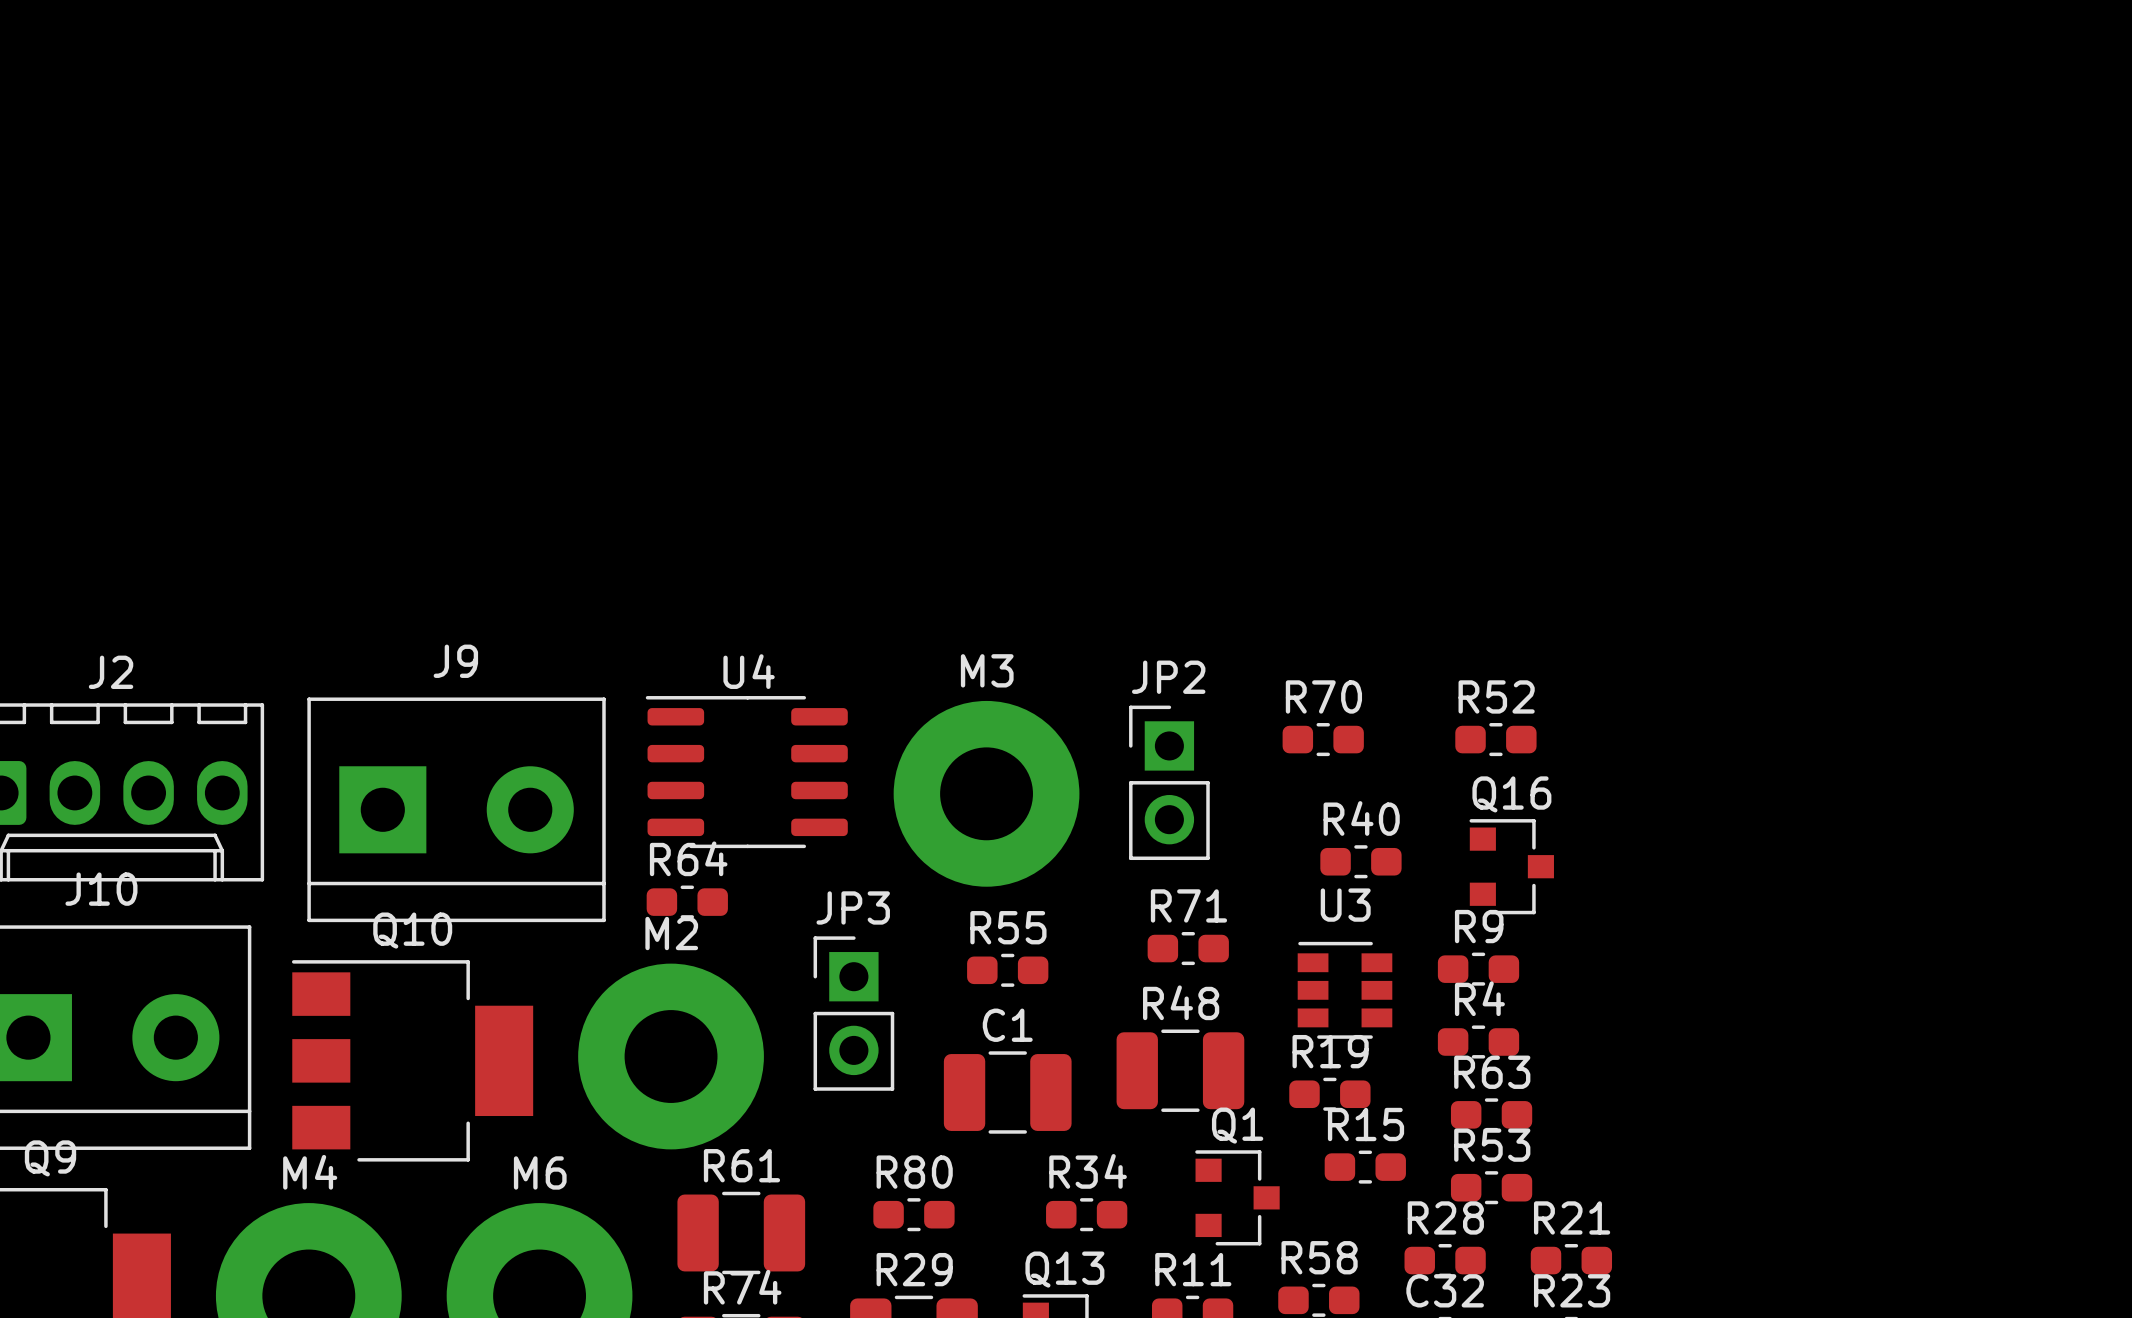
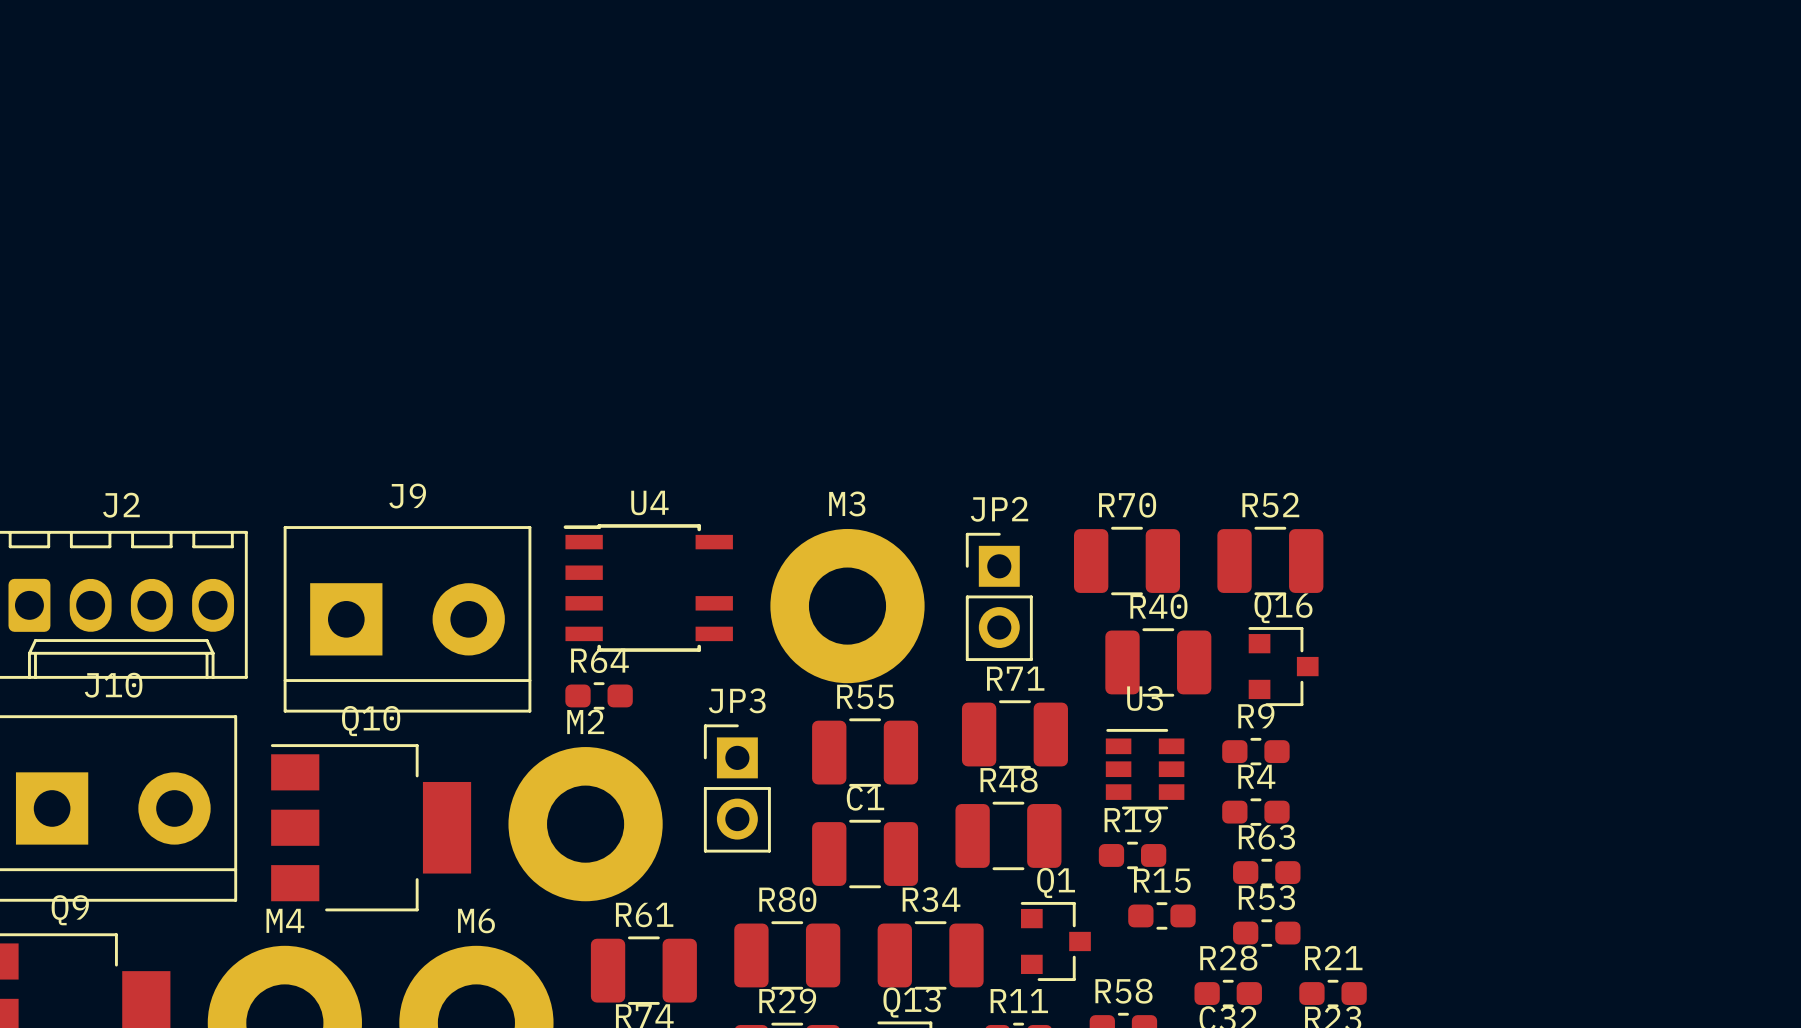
U4 footprint: [645, 696, 848, 849] -> [563, 524, 733, 652]
R70 footprint: [1282, 723, 1364, 757] -> [1074, 526, 1181, 596]
R52 footprint: [1455, 723, 1537, 757] -> [1217, 526, 1324, 596]
R40 footprint: [1320, 845, 1402, 879] -> [1105, 628, 1212, 697]
R71 footprint: [1147, 931, 1229, 966] -> [961, 700, 1068, 769]
R55 footprint: [967, 953, 1049, 987] -> [812, 718, 919, 787]
R80 footprint: [873, 1198, 955, 1232] -> [734, 921, 841, 990]
R34 footprint: [1046, 1198, 1128, 1232] -> [877, 921, 984, 990]

